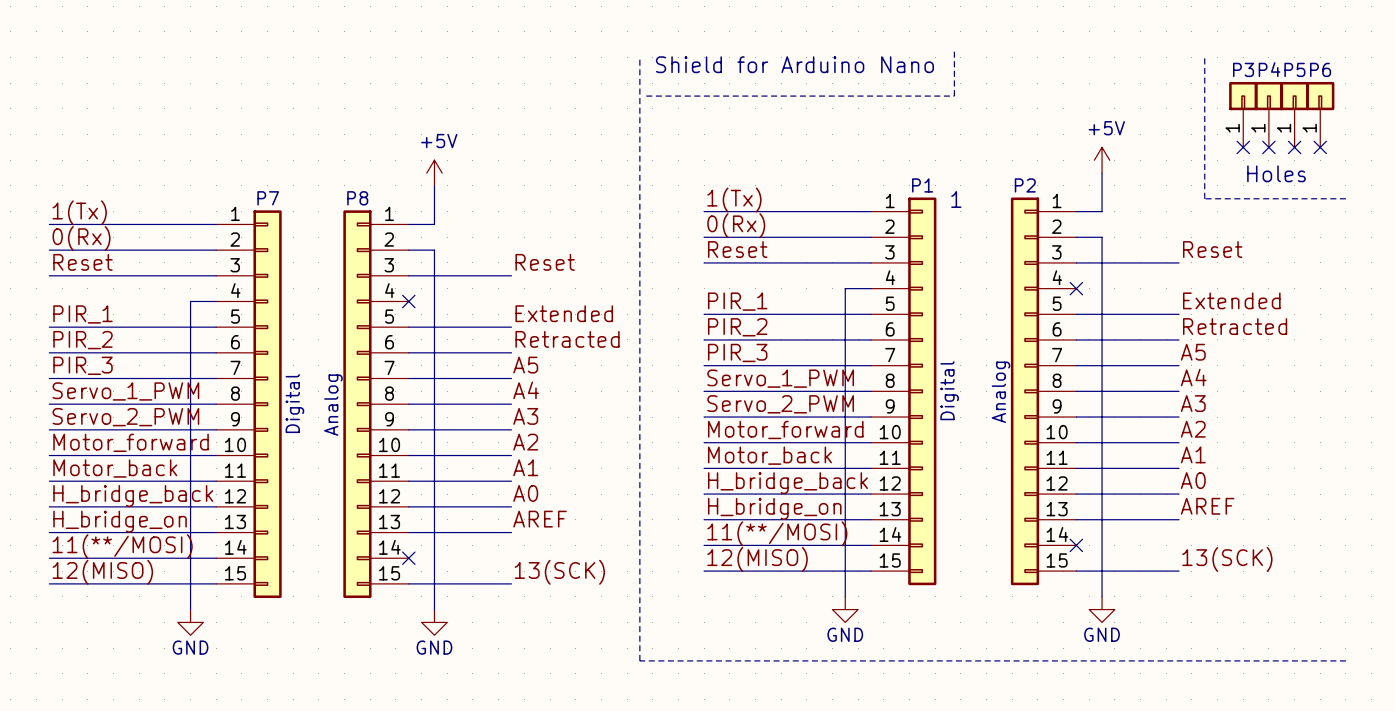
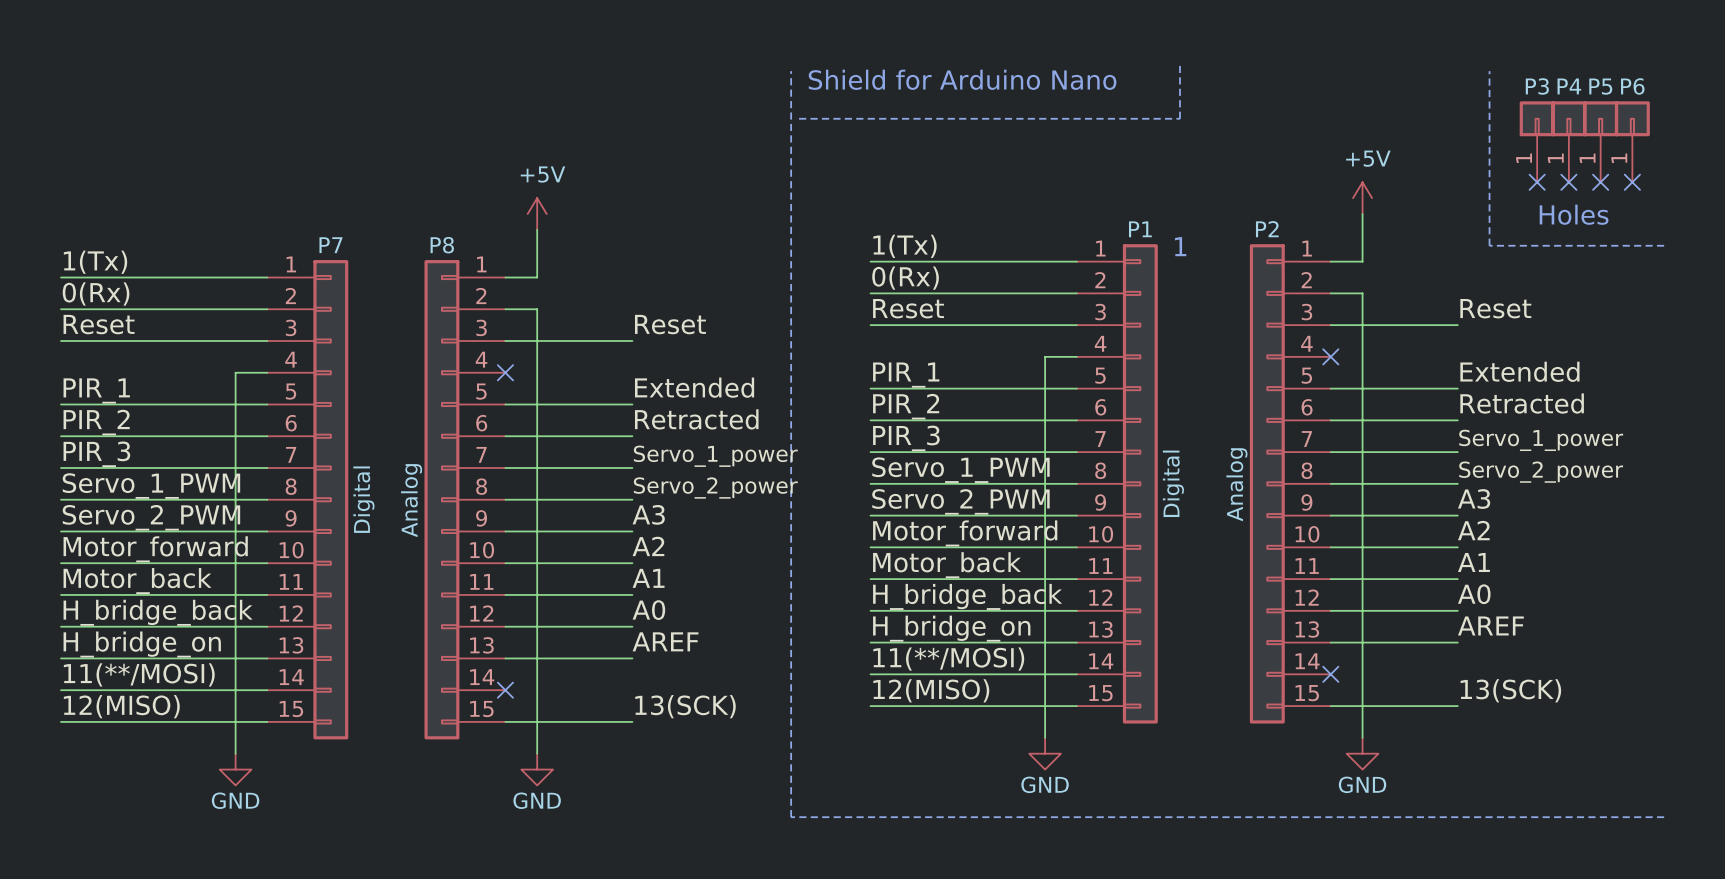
label: A5 (1193, 352) -> Servo_1_power (1541, 440)
label: A5 (525, 365) -> Servo_1_power (715, 456)
label: A4 (1193, 377) -> Servo_2_power (1541, 472)
label: A4 (526, 390) -> Servo_2_power (715, 487)

